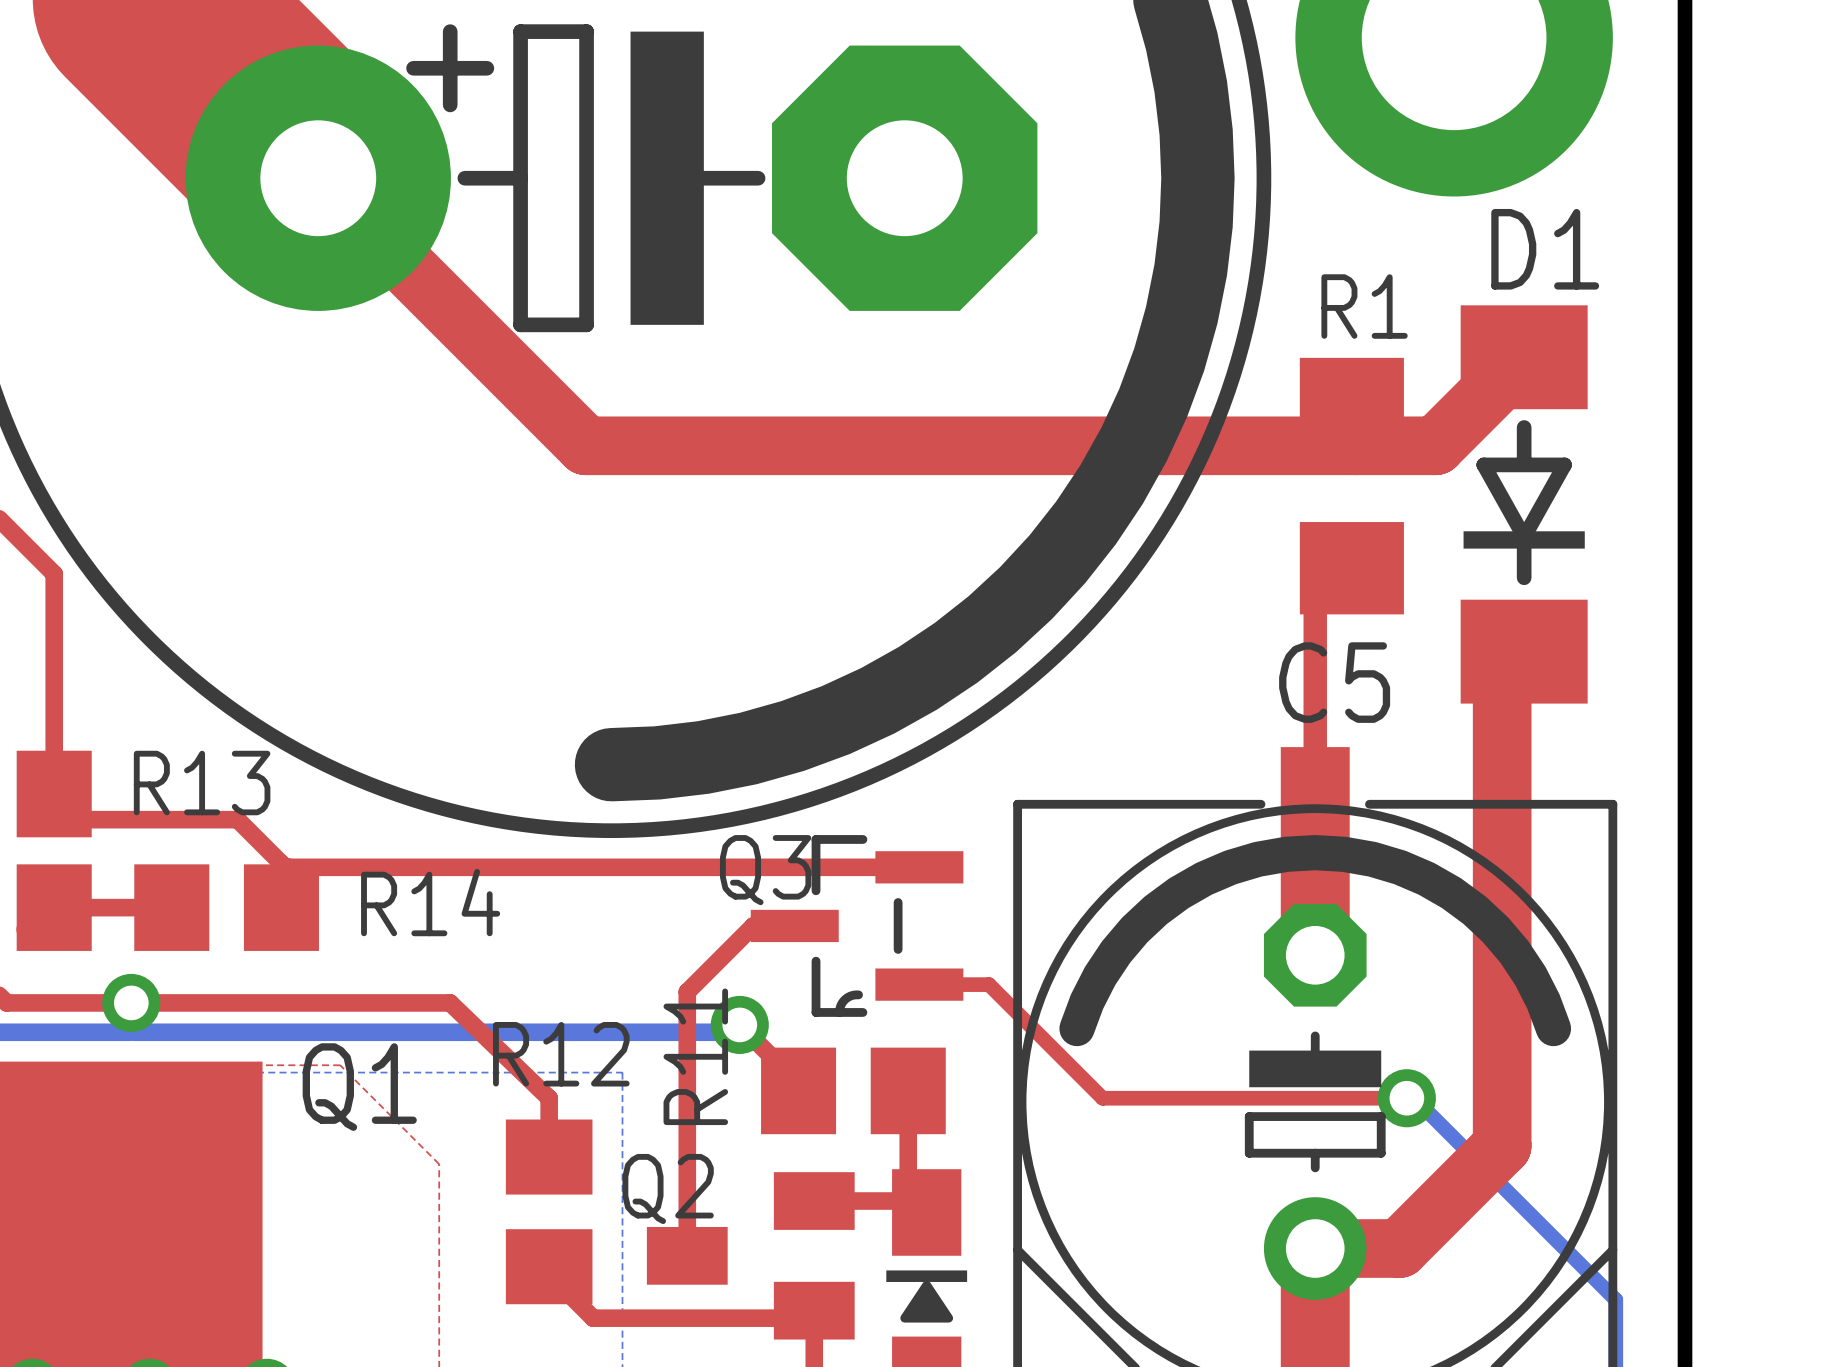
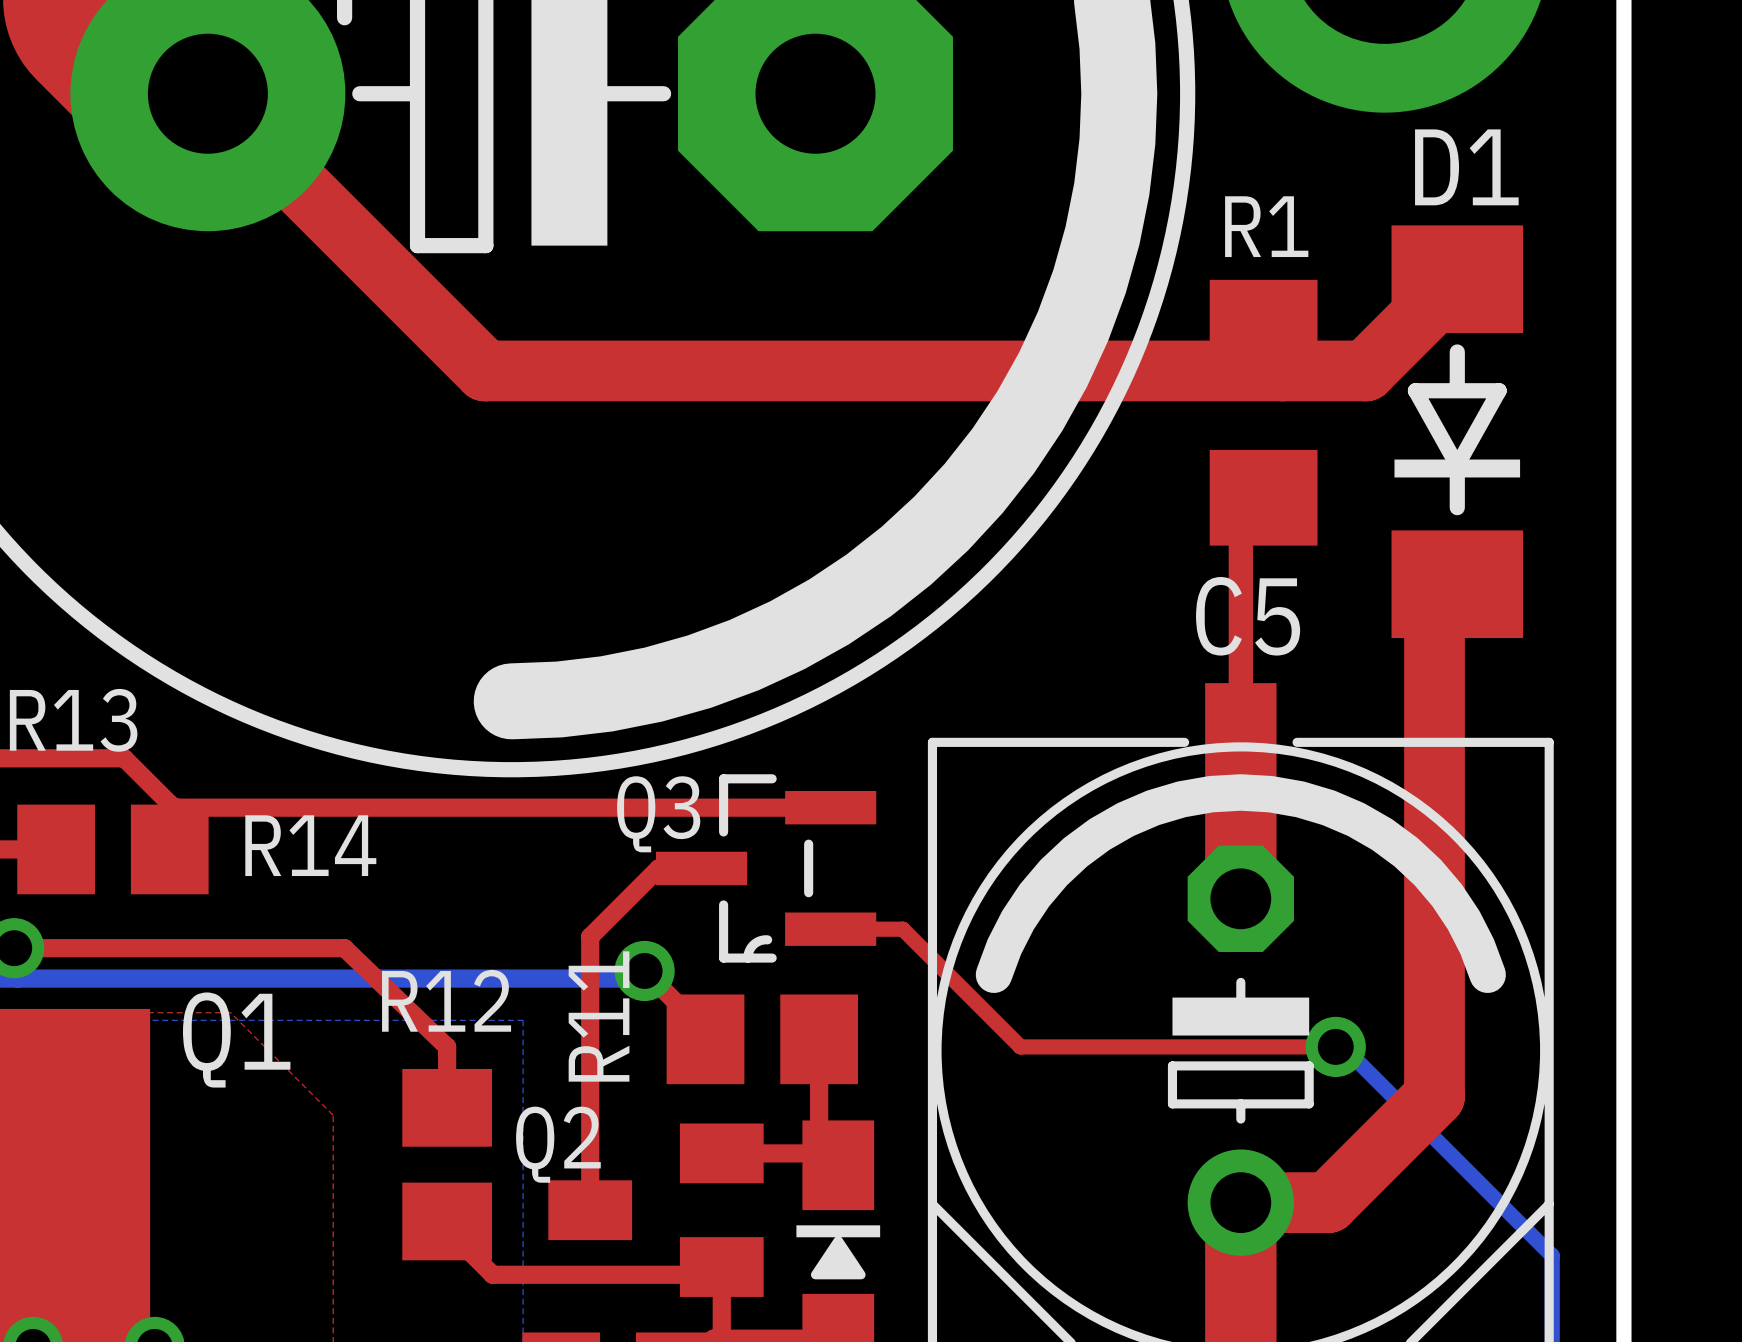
R1 position: (1351, 486) -> (1263, 412)

